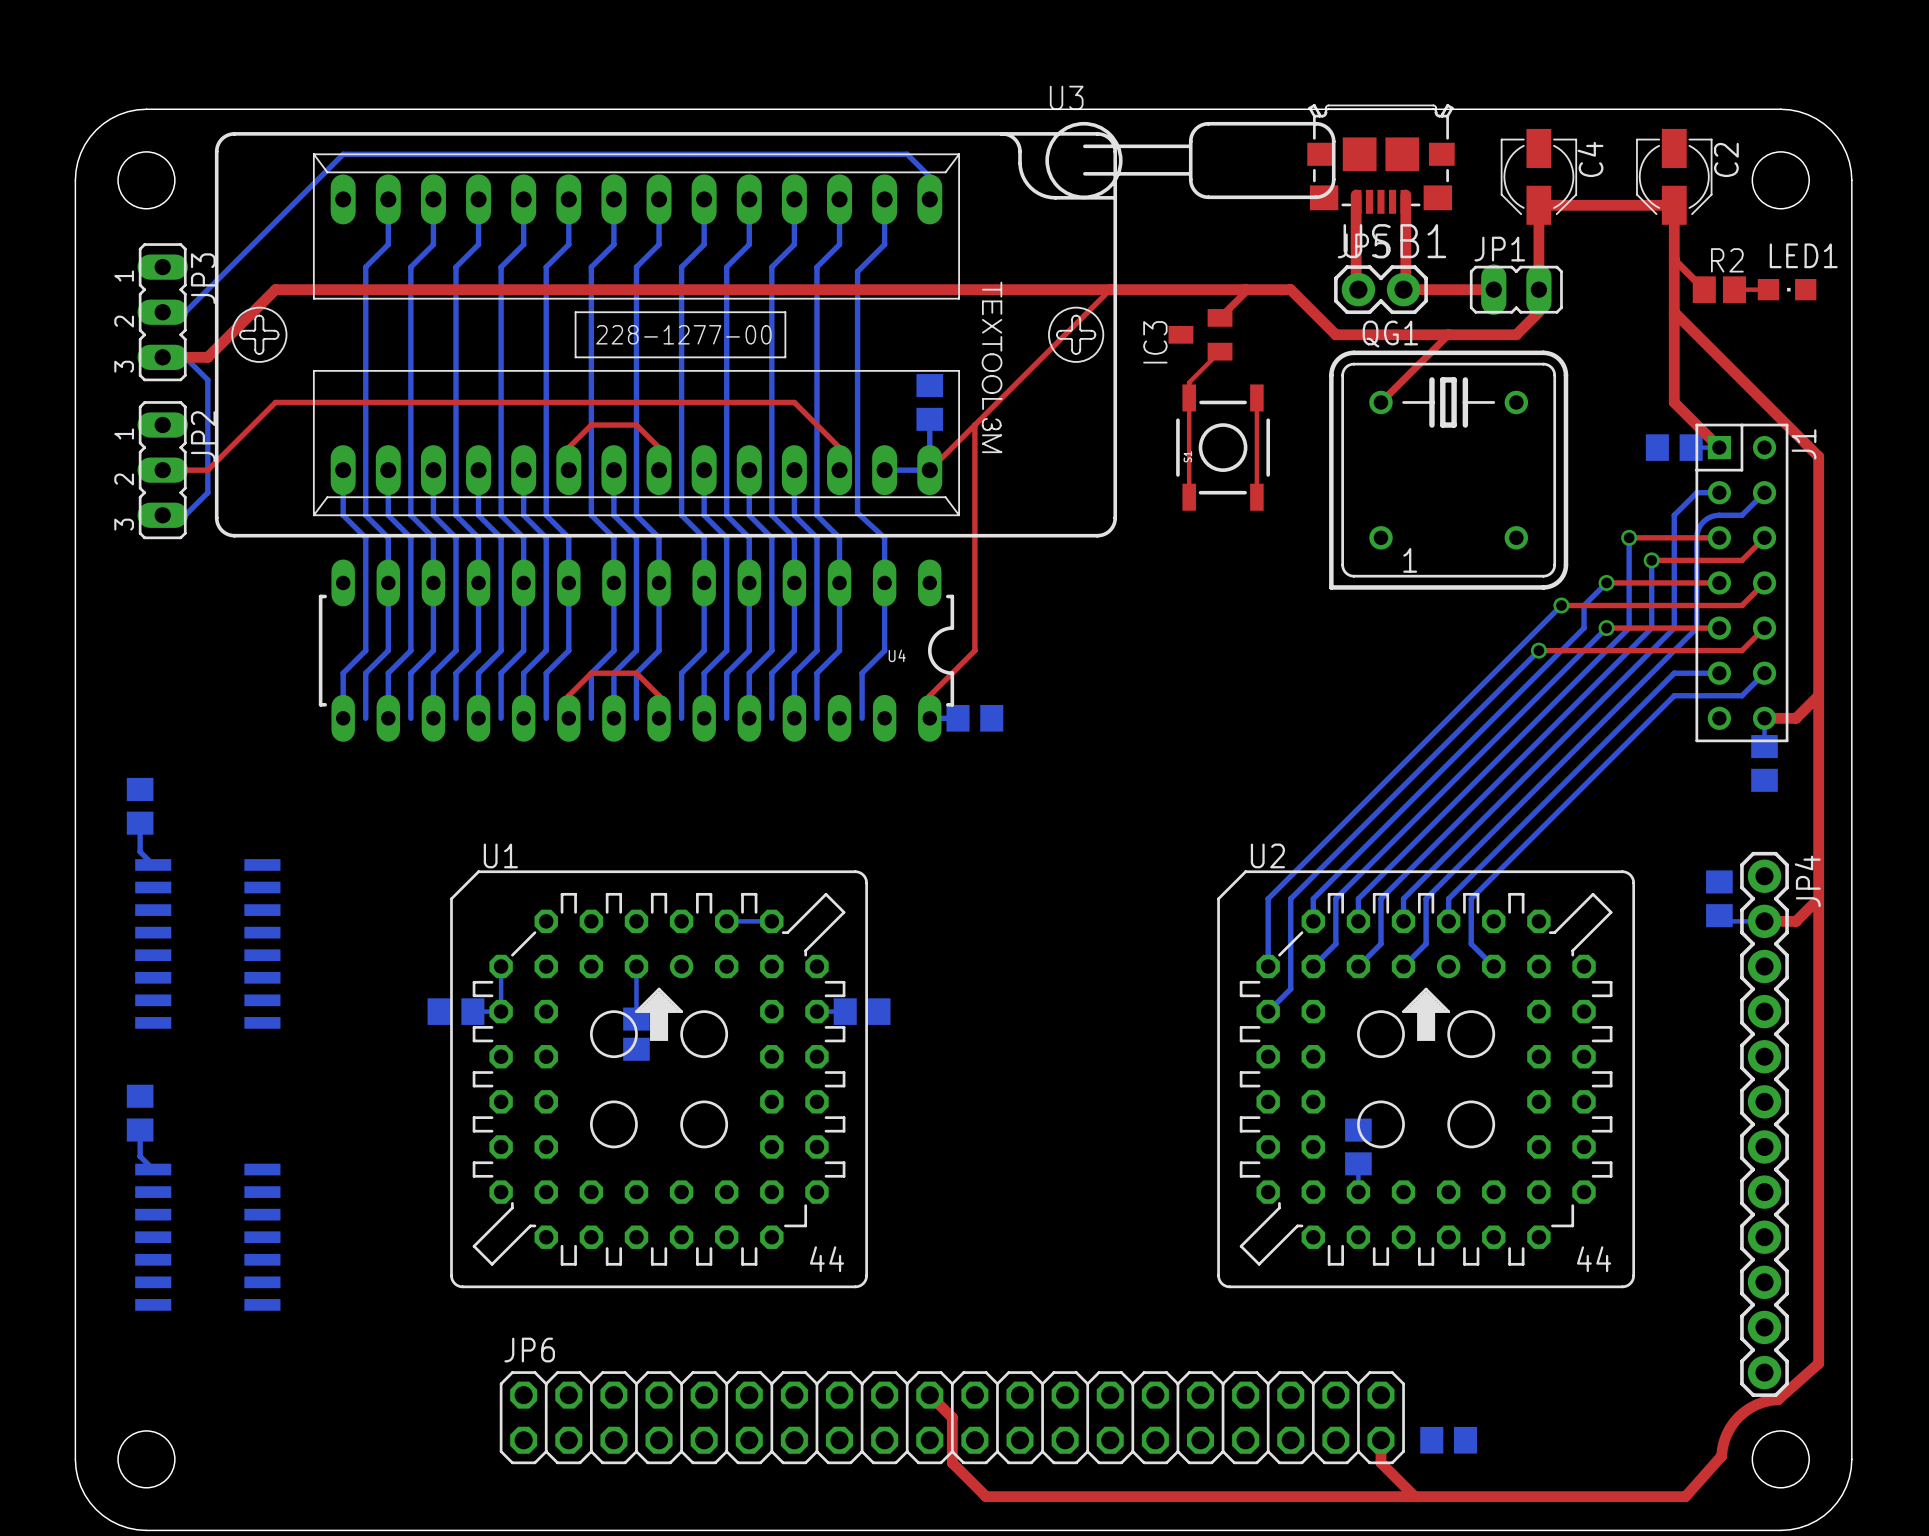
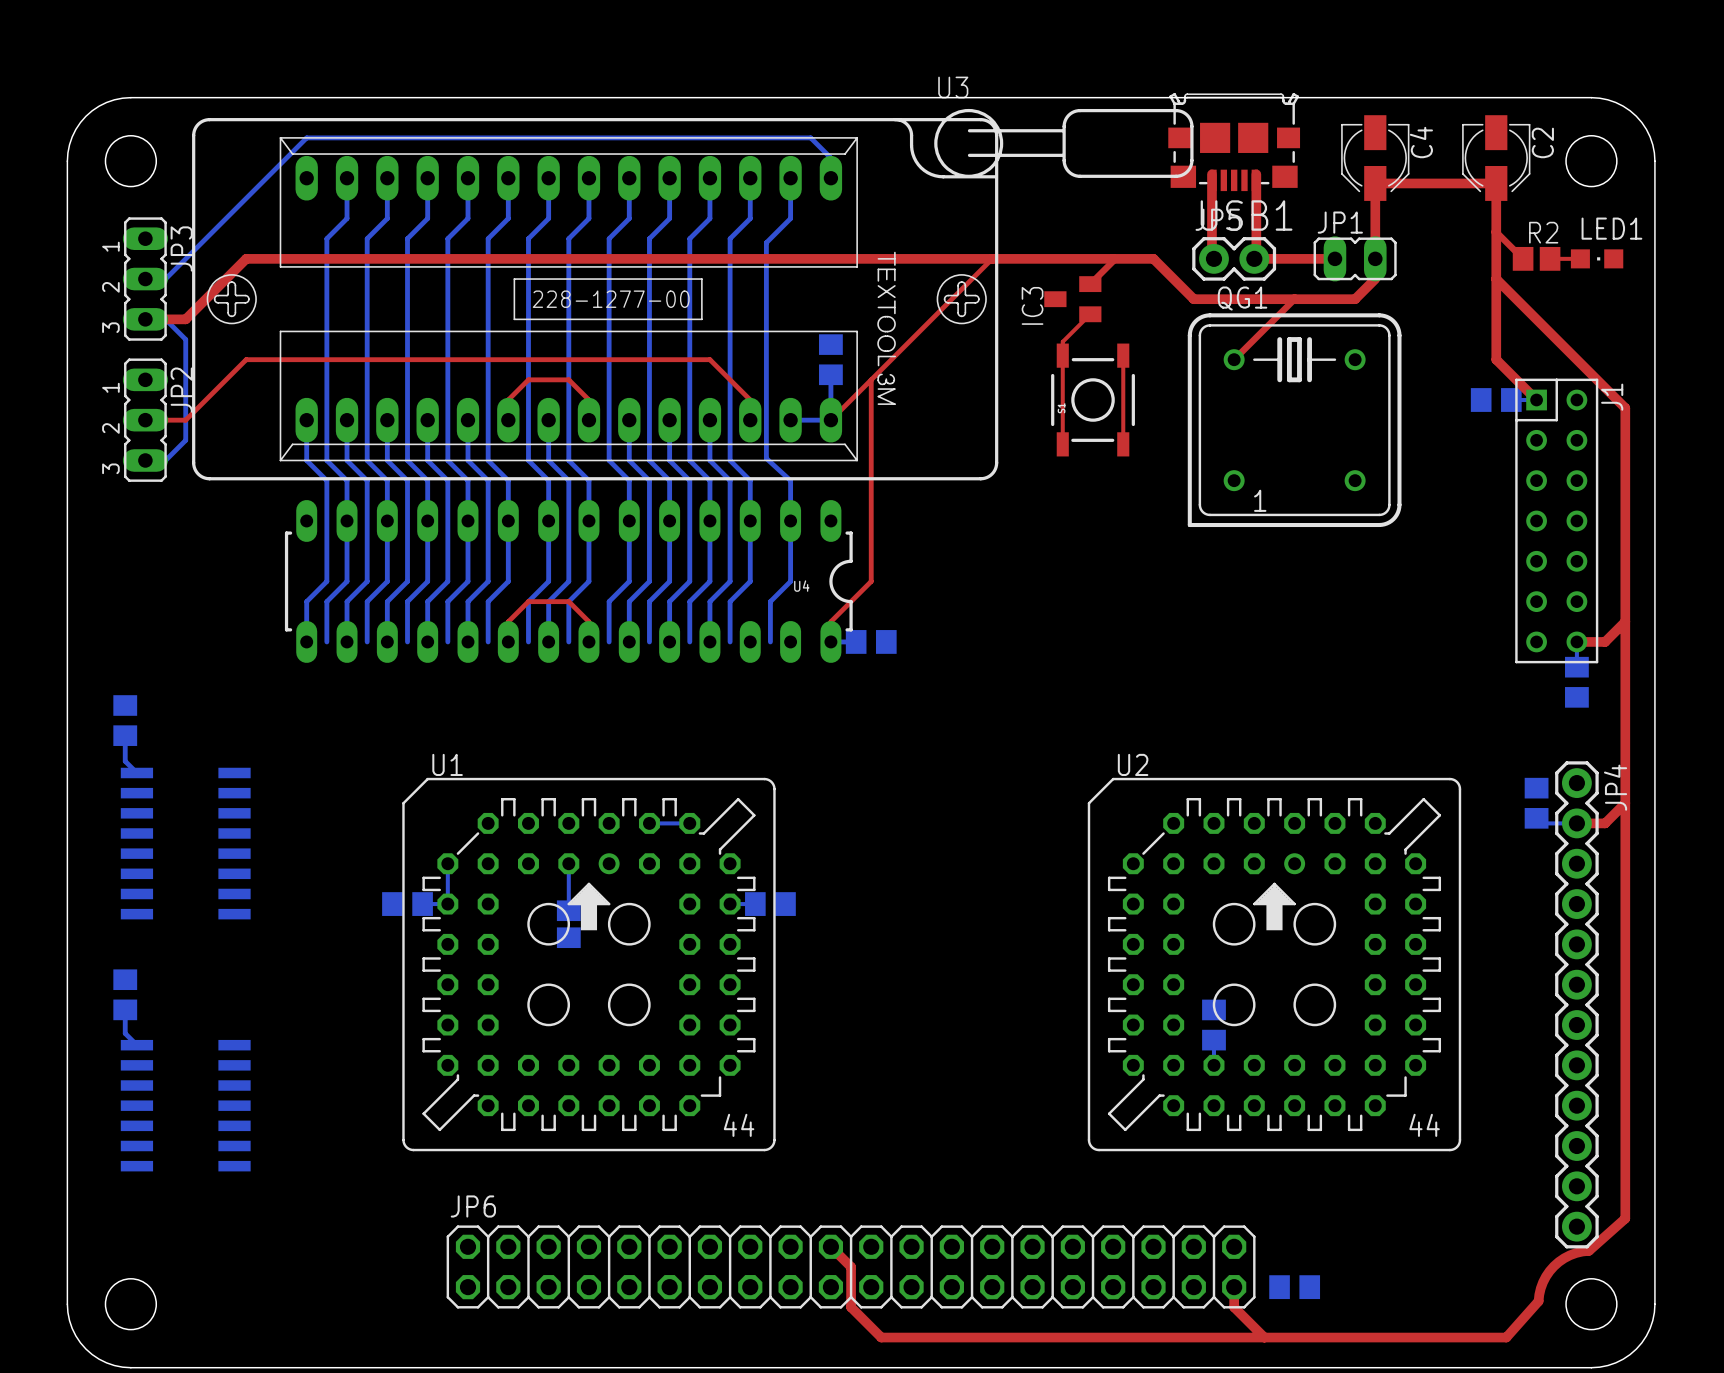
bottom track: (1719, 492) (1696, 492) (1674, 515) (1674, 628) (1403, 898) (1403, 921) -> none
bottom track: (1764, 492) (1741, 515) (1713, 516) (1701, 524) (1696, 537) (1696, 628) (1426, 898) (1426, 943) (1403, 966) -> none
bottom track: (1629, 537) (1629, 628) (1358, 898) (1358, 921) -> none
top track: (1629, 537) (1719, 537) -> none
via: (1629, 537) -> none
top track: (1764, 537) (1741, 560) (1651, 560) -> none
bottom track: (1651, 560) (1651, 628) (1380, 898) (1380, 943) (1358, 966) -> none
via: (1651, 560) -> none
bottom track: (1606, 582) (1584, 605) (1584, 628) (1313, 898) (1313, 921) -> none
top track: (1606, 582) (1719, 582) -> none
via: (1606, 582) -> none
top track: (1764, 582) (1741, 605) (1561, 605) -> none
bottom track: (1561, 605) (1268, 898) (1268, 966) -> none
via: (1561, 605) -> none
bottom track: (1606, 628) (1335, 898) (1335, 943) (1313, 966) -> none
top track: (1606, 628) (1719, 628) -> none
via: (1606, 628) -> none
top track: (1764, 628) (1741, 650) (1538, 650) -> none
bottom track: (1538, 650) (1290, 898) (1290, 989) (1268, 1011) -> none
via: (1538, 650) -> none
bottom track: (1719, 673) (1674, 673) (1448, 898) (1448, 921) -> none
bottom track: (1764, 673) (1741, 695) (1674, 695) (1471, 898) (1471, 943) (1493, 966) -> none

